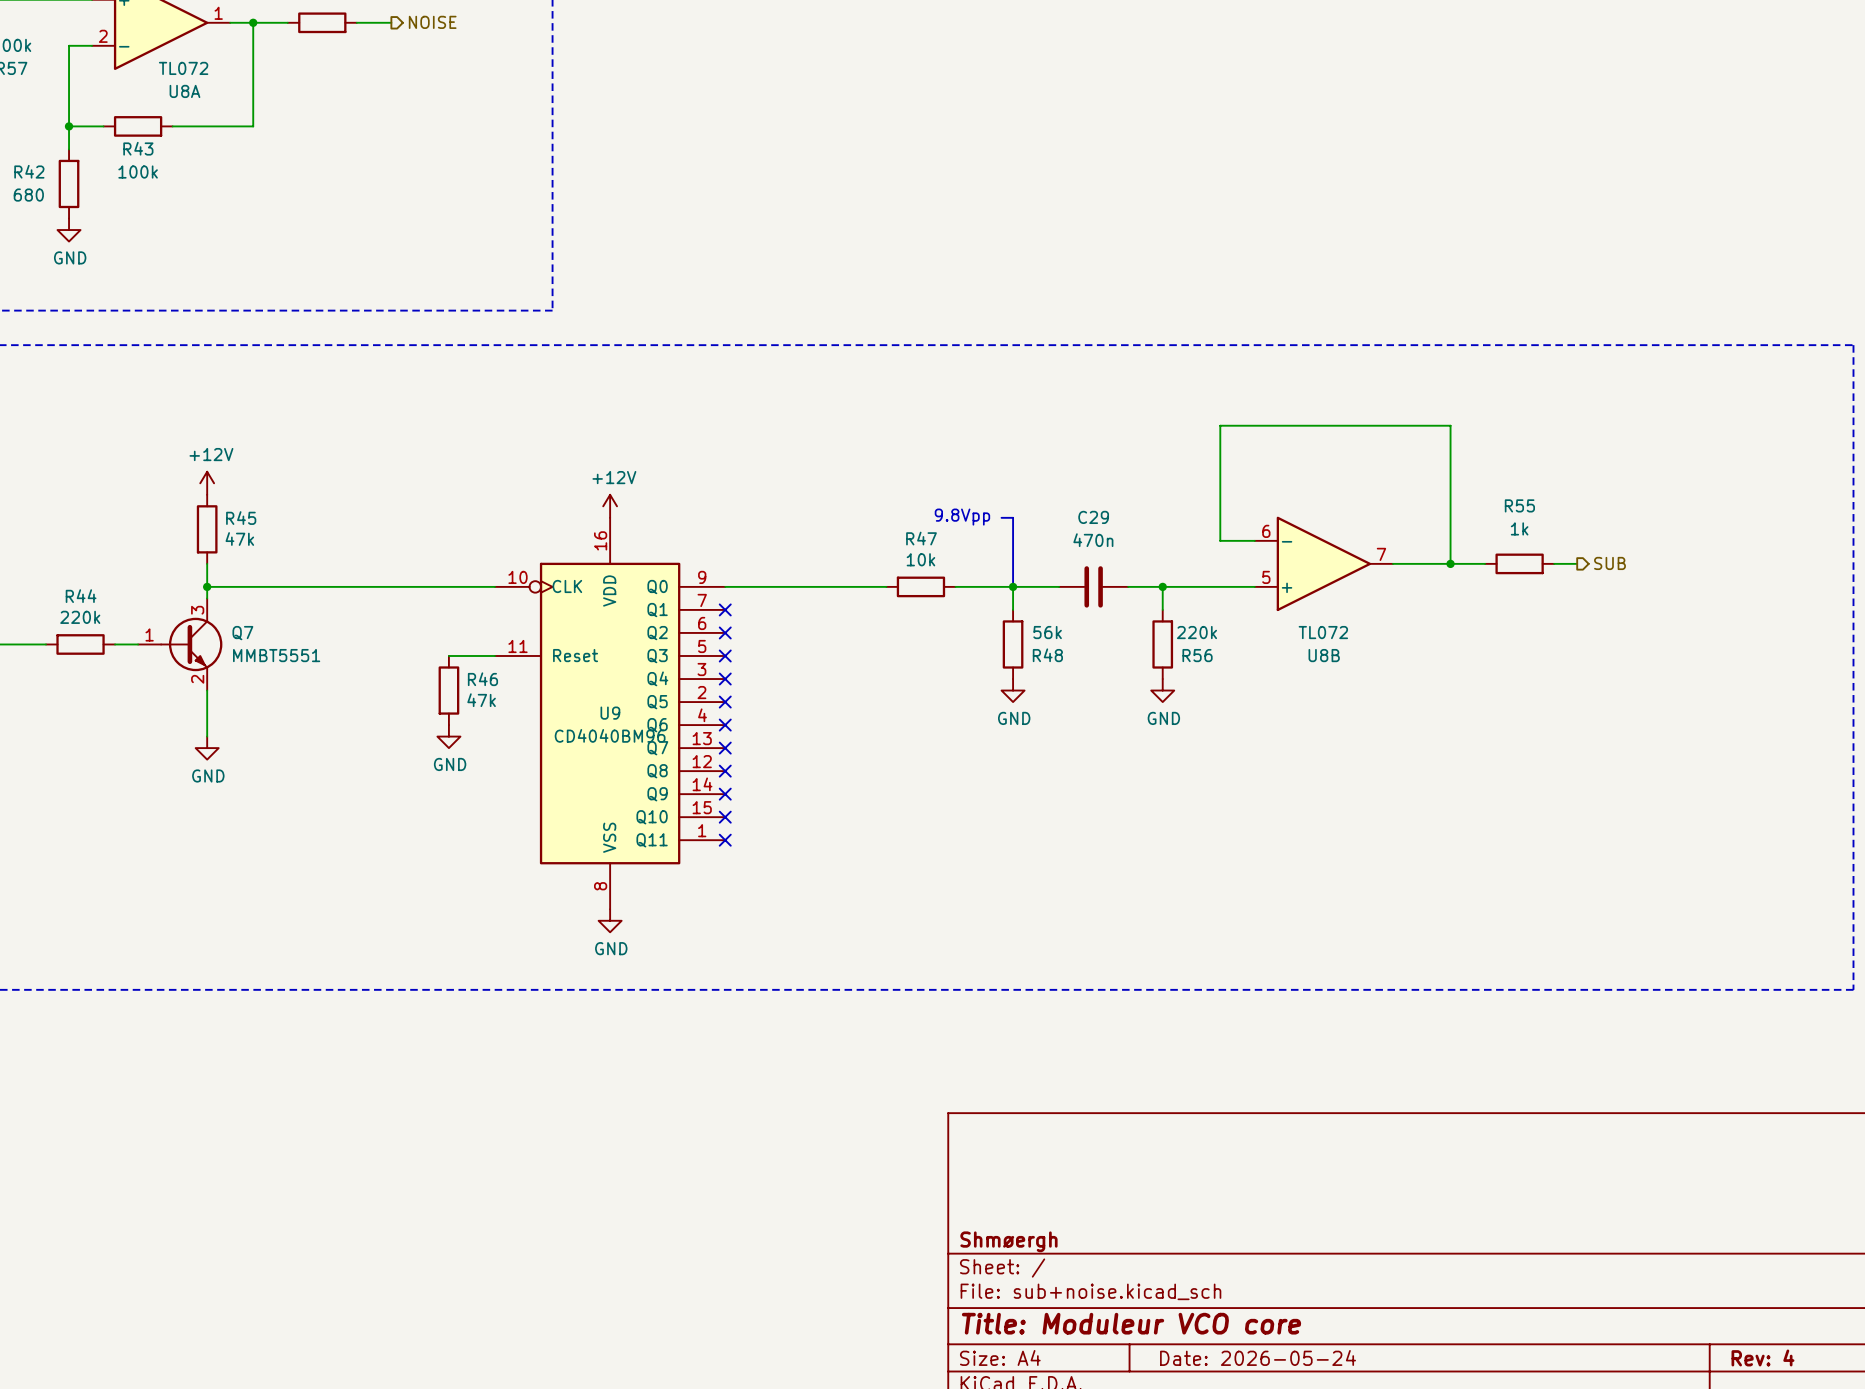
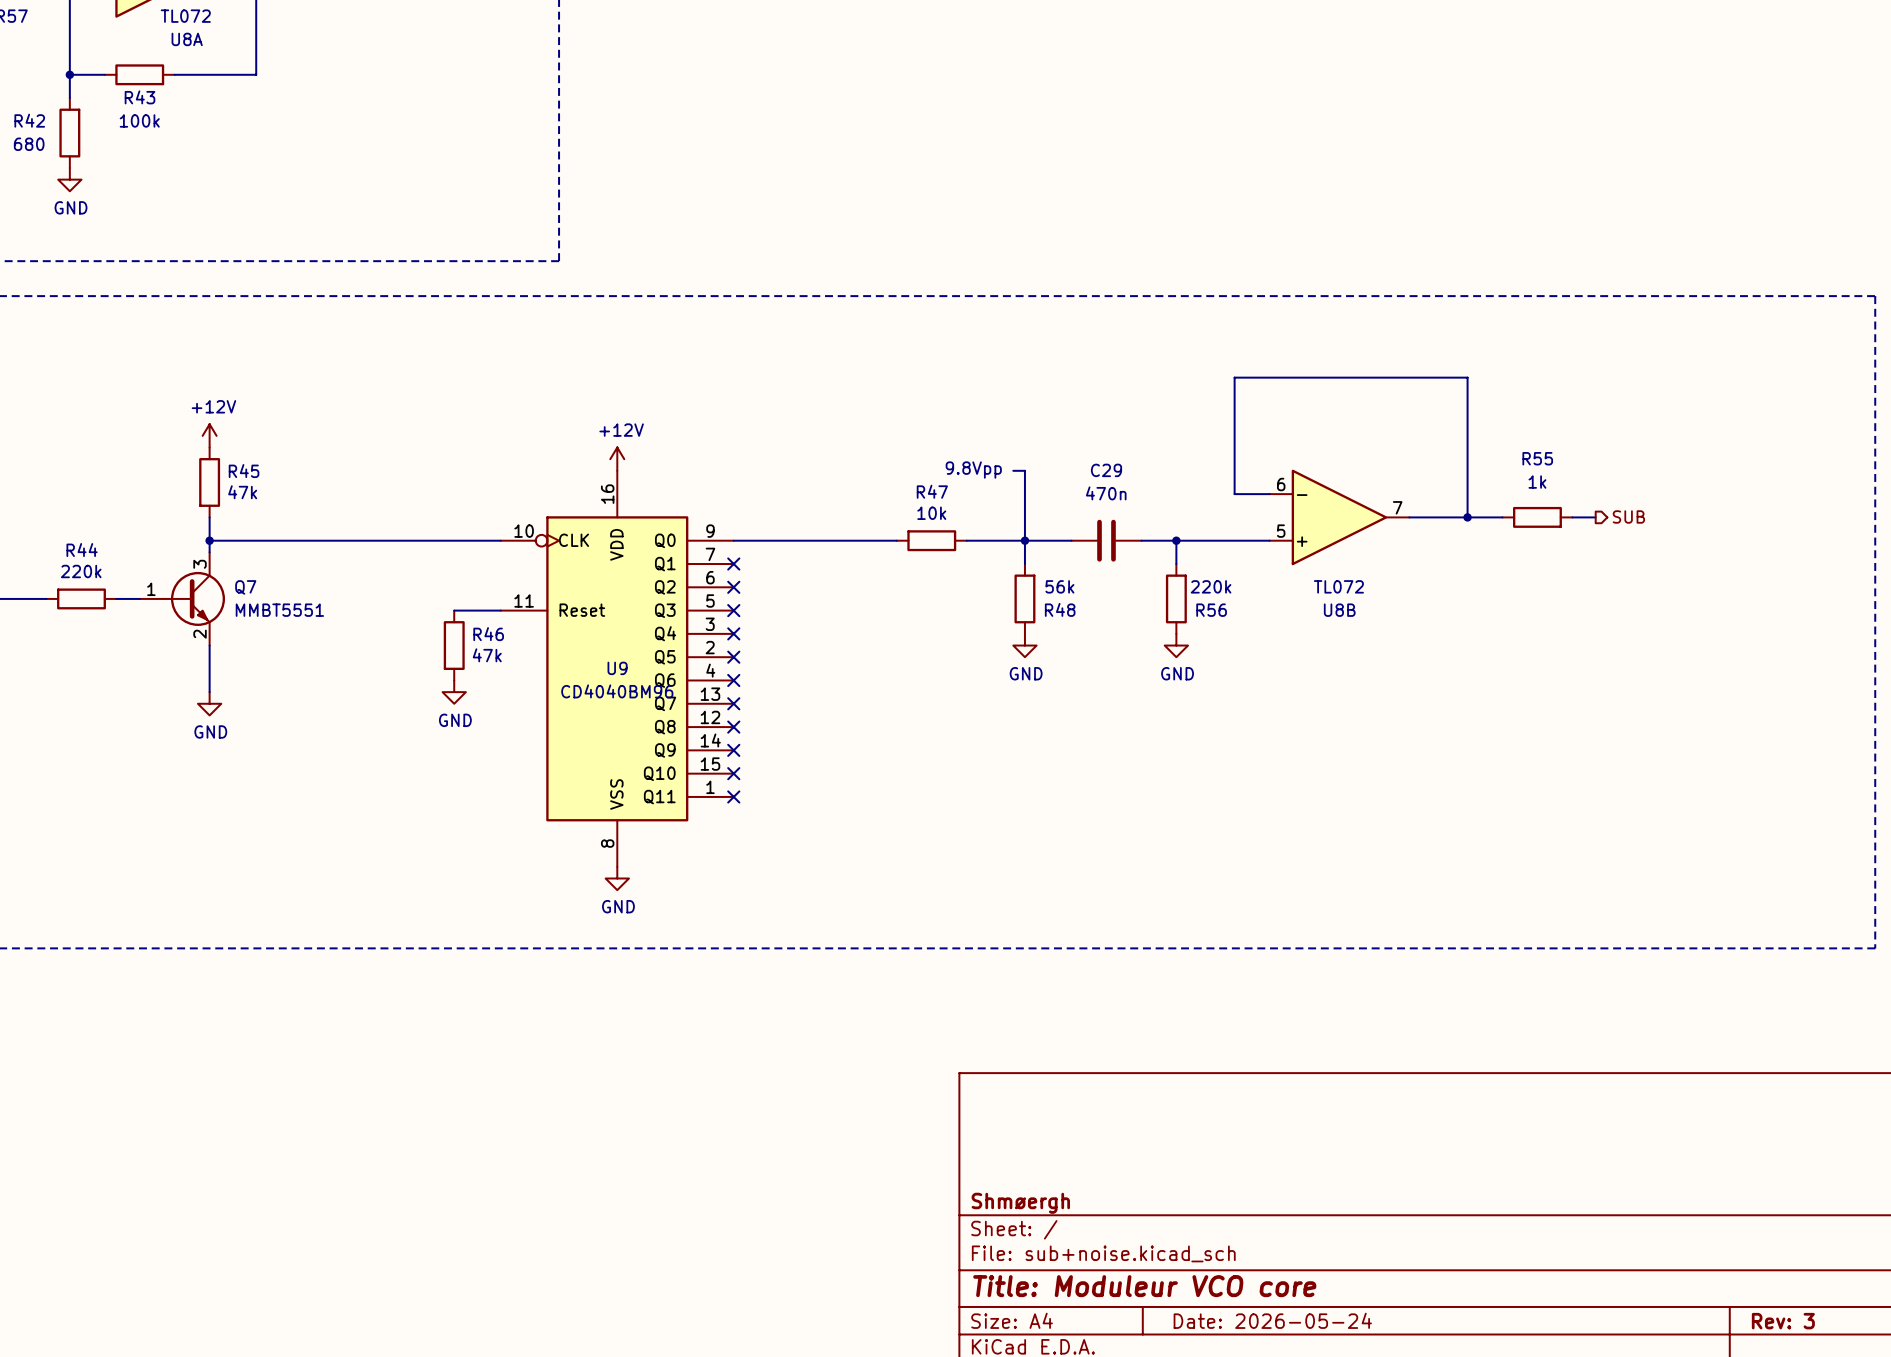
title block: Rev: 4 (1762, 1357) -> Rev: 3 (1783, 1321)

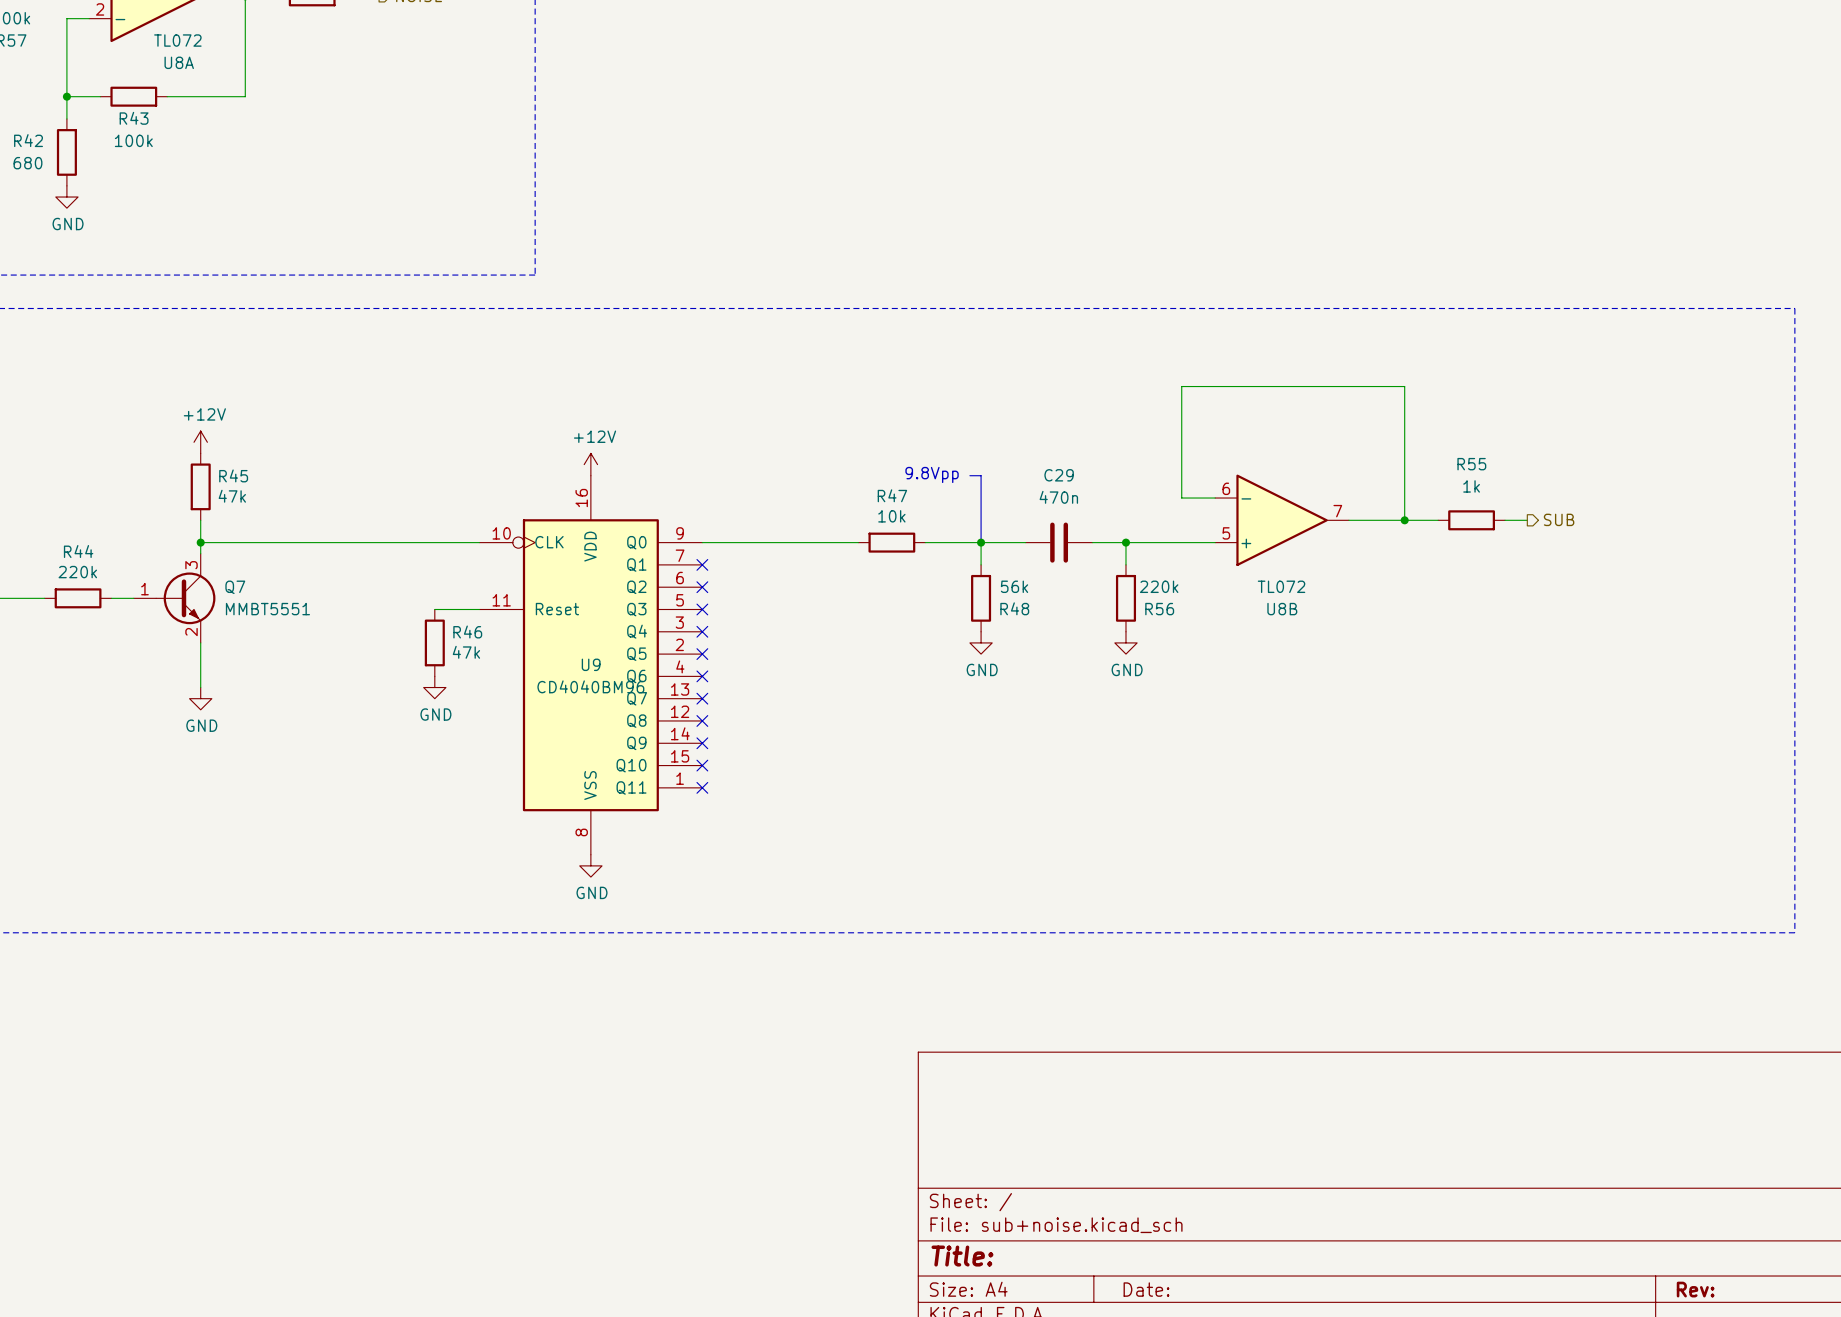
title block: Shmøergh (1020, 1203) -> none
title block: Title: Moduleur VCO core (1144, 1286) -> Title: (962, 1256)
title block: Date: 2026-05-24 (1272, 1320) -> Date: (1146, 1289)
title block: Rev: 3 (1783, 1321) -> Rev: (1695, 1289)

